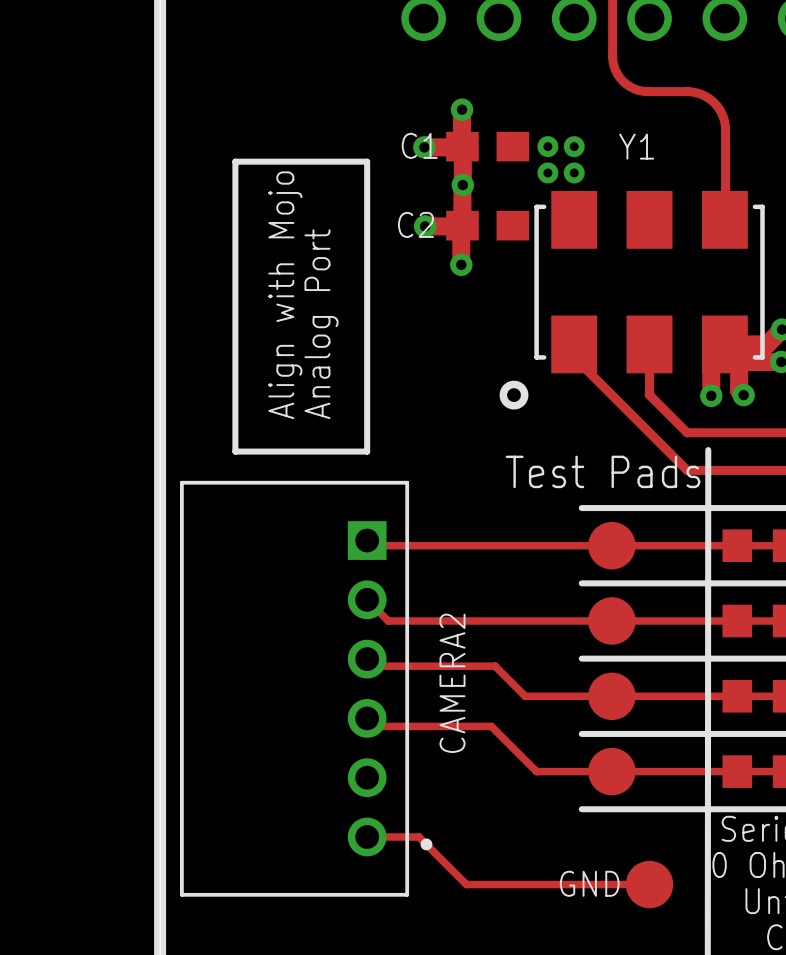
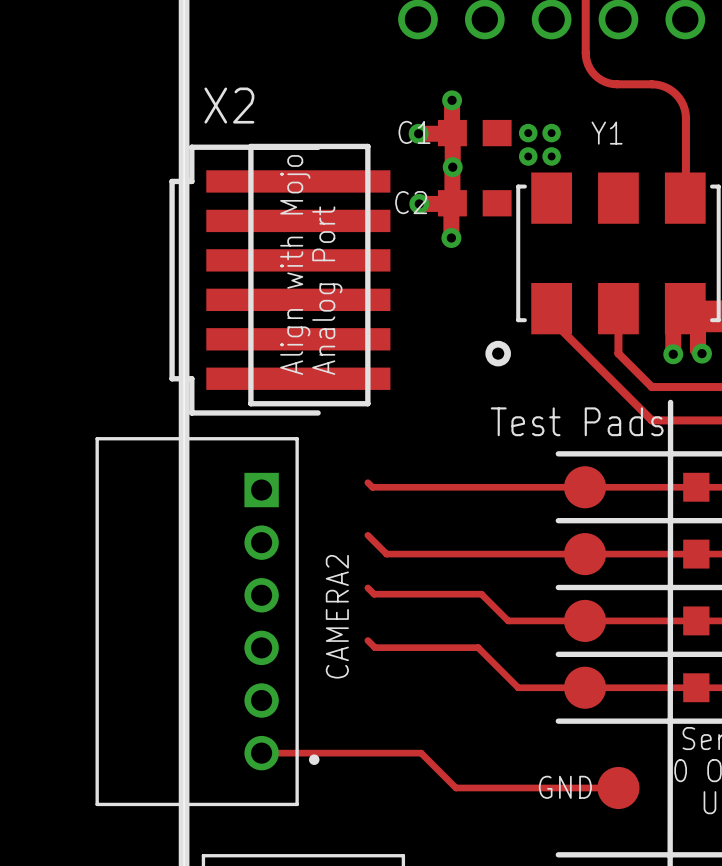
X2: none -> (279, 280)
CAMERA2 position: (306, 688) -> (207, 621)
track: (367, 836) (418, 836) (427, 845) -> (261, 753) (421, 753)

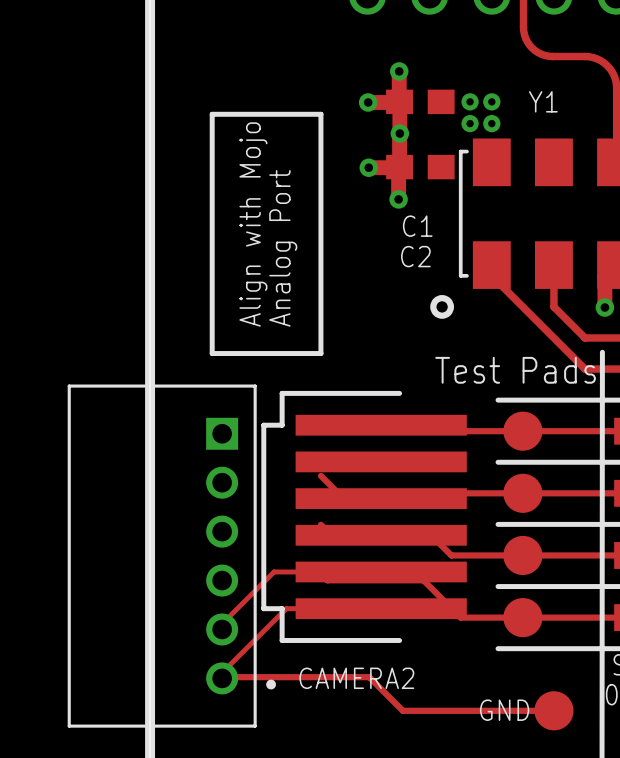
C1 name position: C1 (414, 132) -> C1 (417, 226)
C2 name position: C2 (411, 202) -> C2 (415, 256)
X2: (279, 280) -> none
part: none -> (364, 516)
CAMERA2 name rotation: 0° (337, 616) -> 90° clockwise (356, 678)
CAMERA2 name position: CAMERA2 (337, 616) -> CAMERA2 (356, 678)
track: none -> (381, 571) (274, 571) (217, 628)
track: (261, 753) (421, 753) -> (381, 608) (286, 608) (217, 677) (370, 678)

